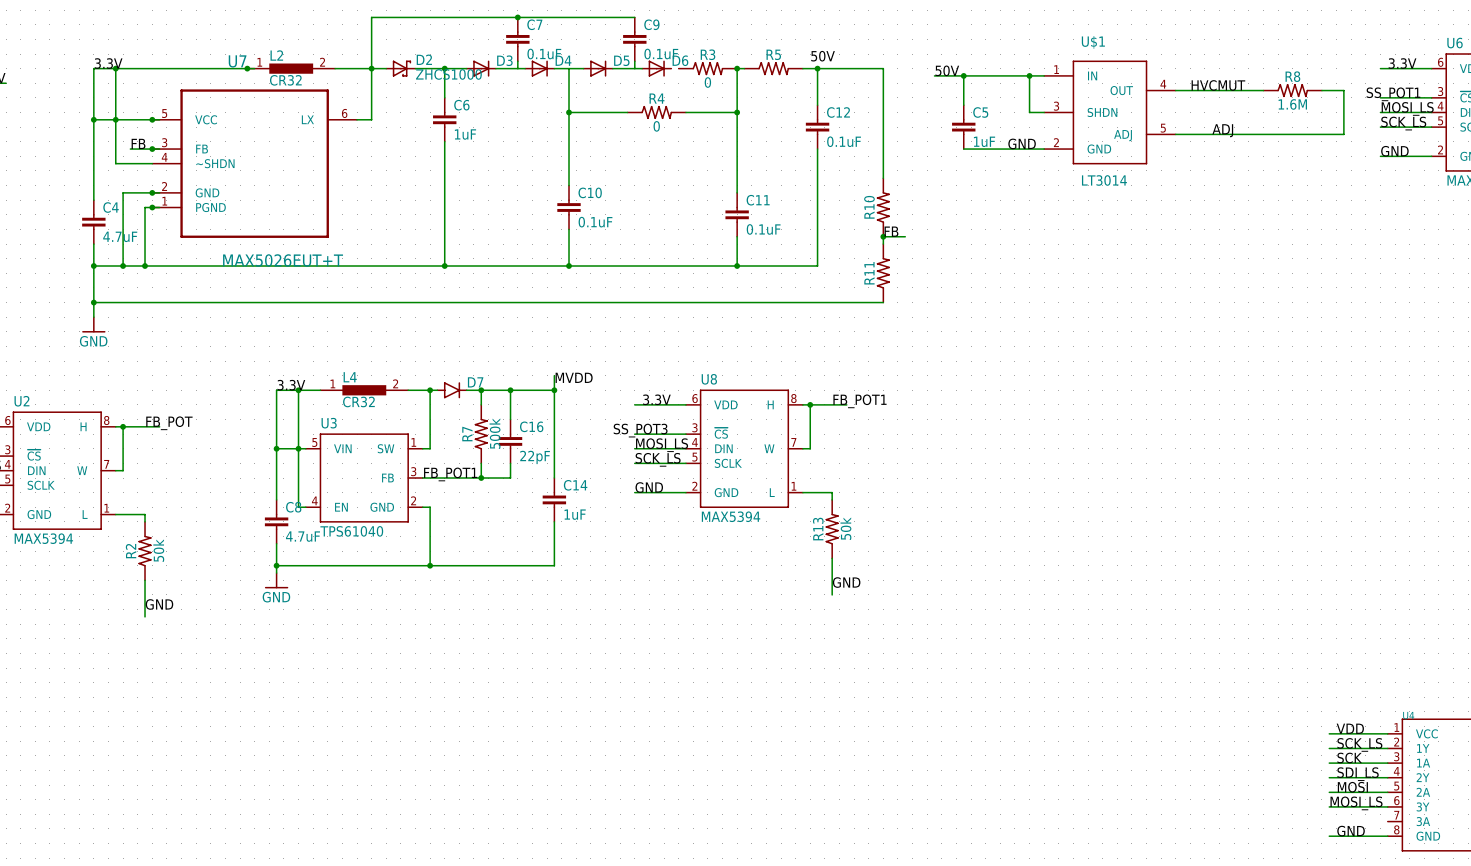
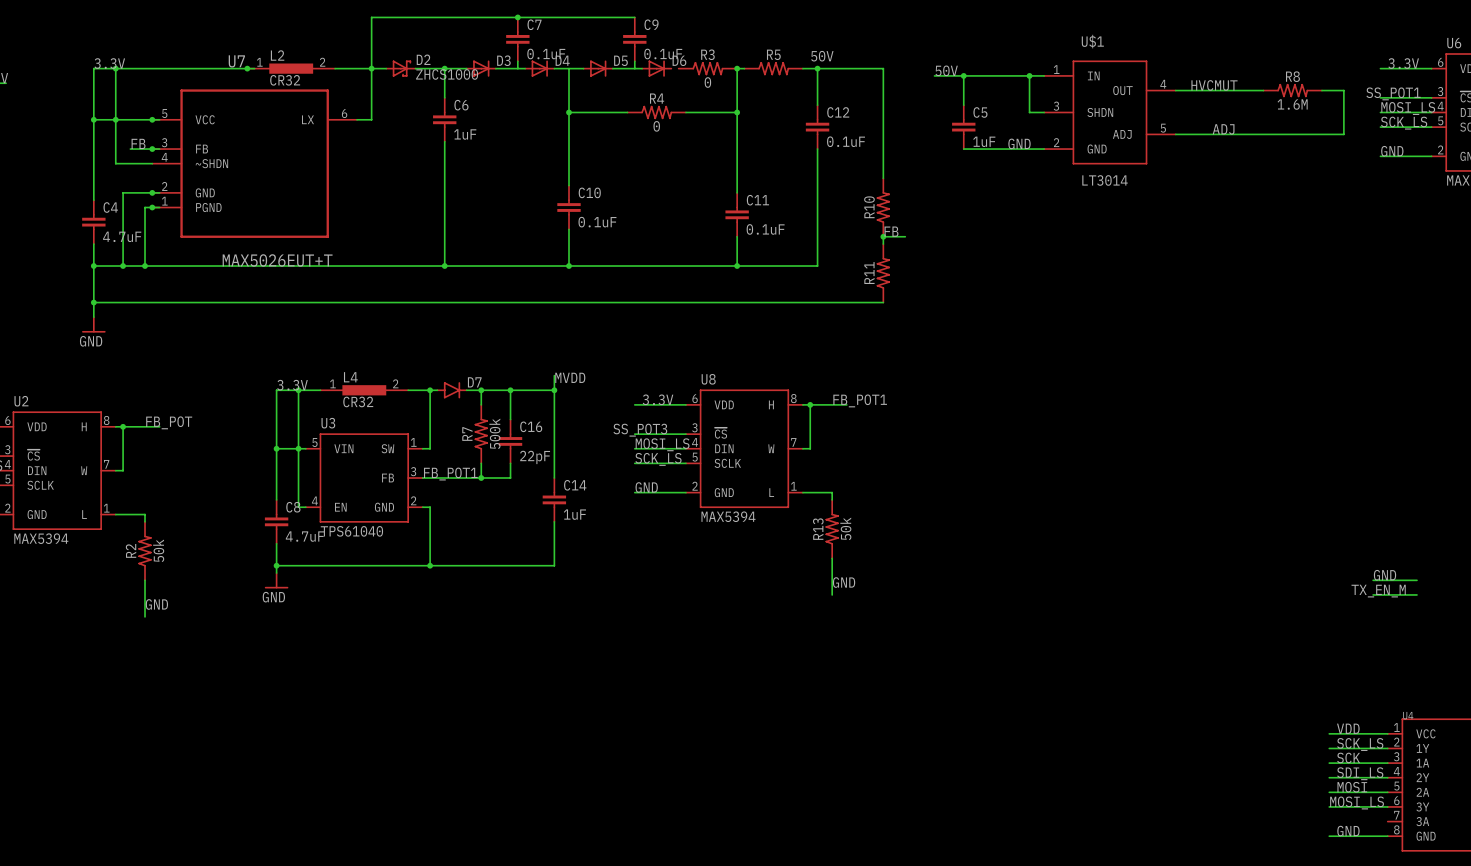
label: none -> GND (1385, 575)
wire: none -> (1373, 580) (1416, 580)
label: none -> TX_EN_M (1378, 591)
wire: none -> (1373, 594) (1416, 594)

